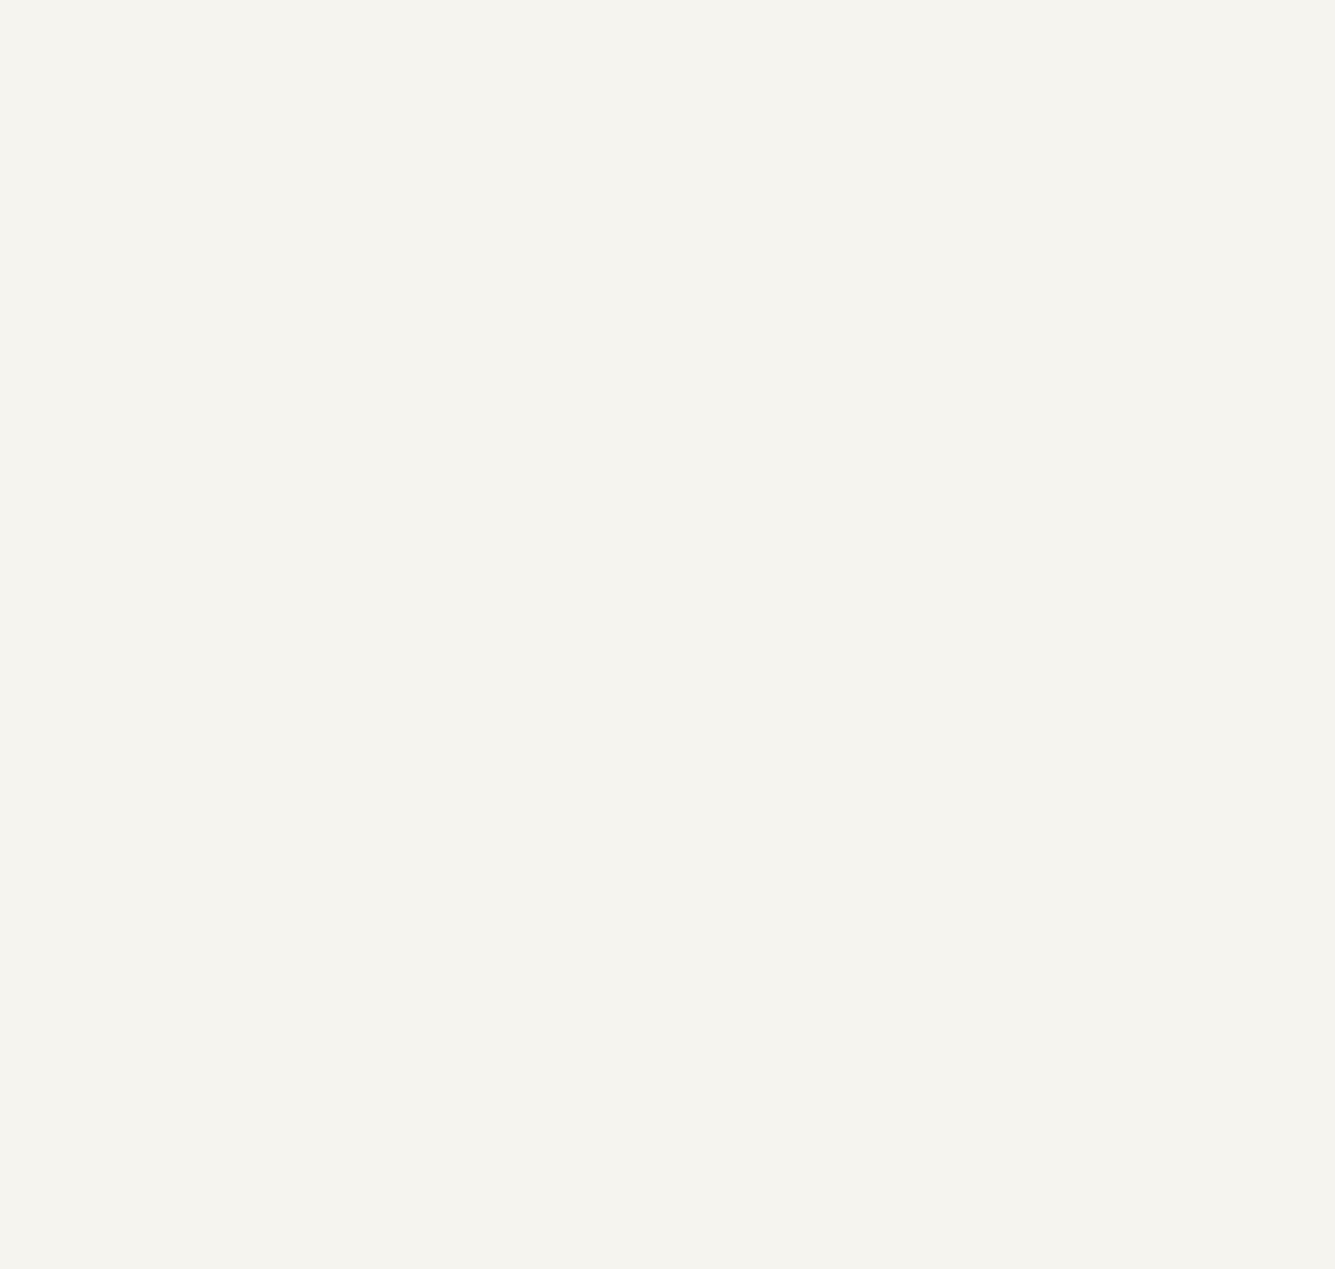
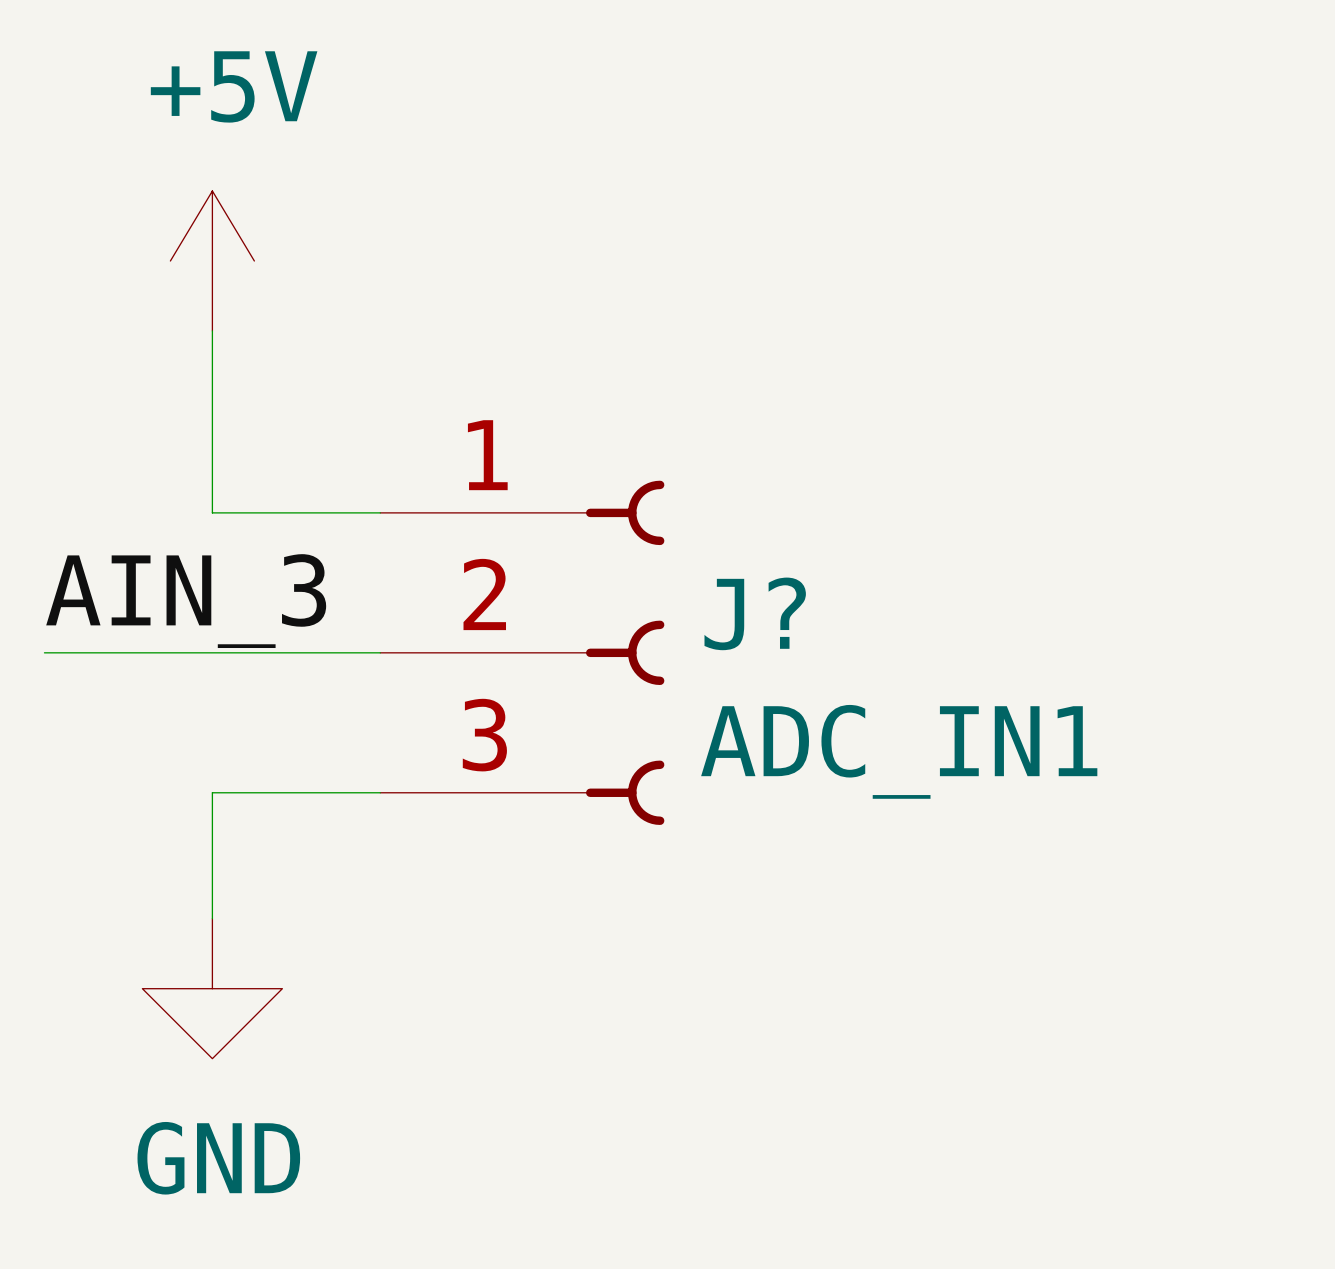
power symbol: none -> +5V (212, 261)
wire: none -> (212, 330) (212, 512) (380, 512)
label: none -> AIN_3 (186, 601)
wire: none -> (44, 652) (380, 652)
J?: none -> ADC_IN1 (522, 652)
wire: none -> (380, 792) (212, 792) (212, 918)
power symbol: none -> GND (212, 988)

